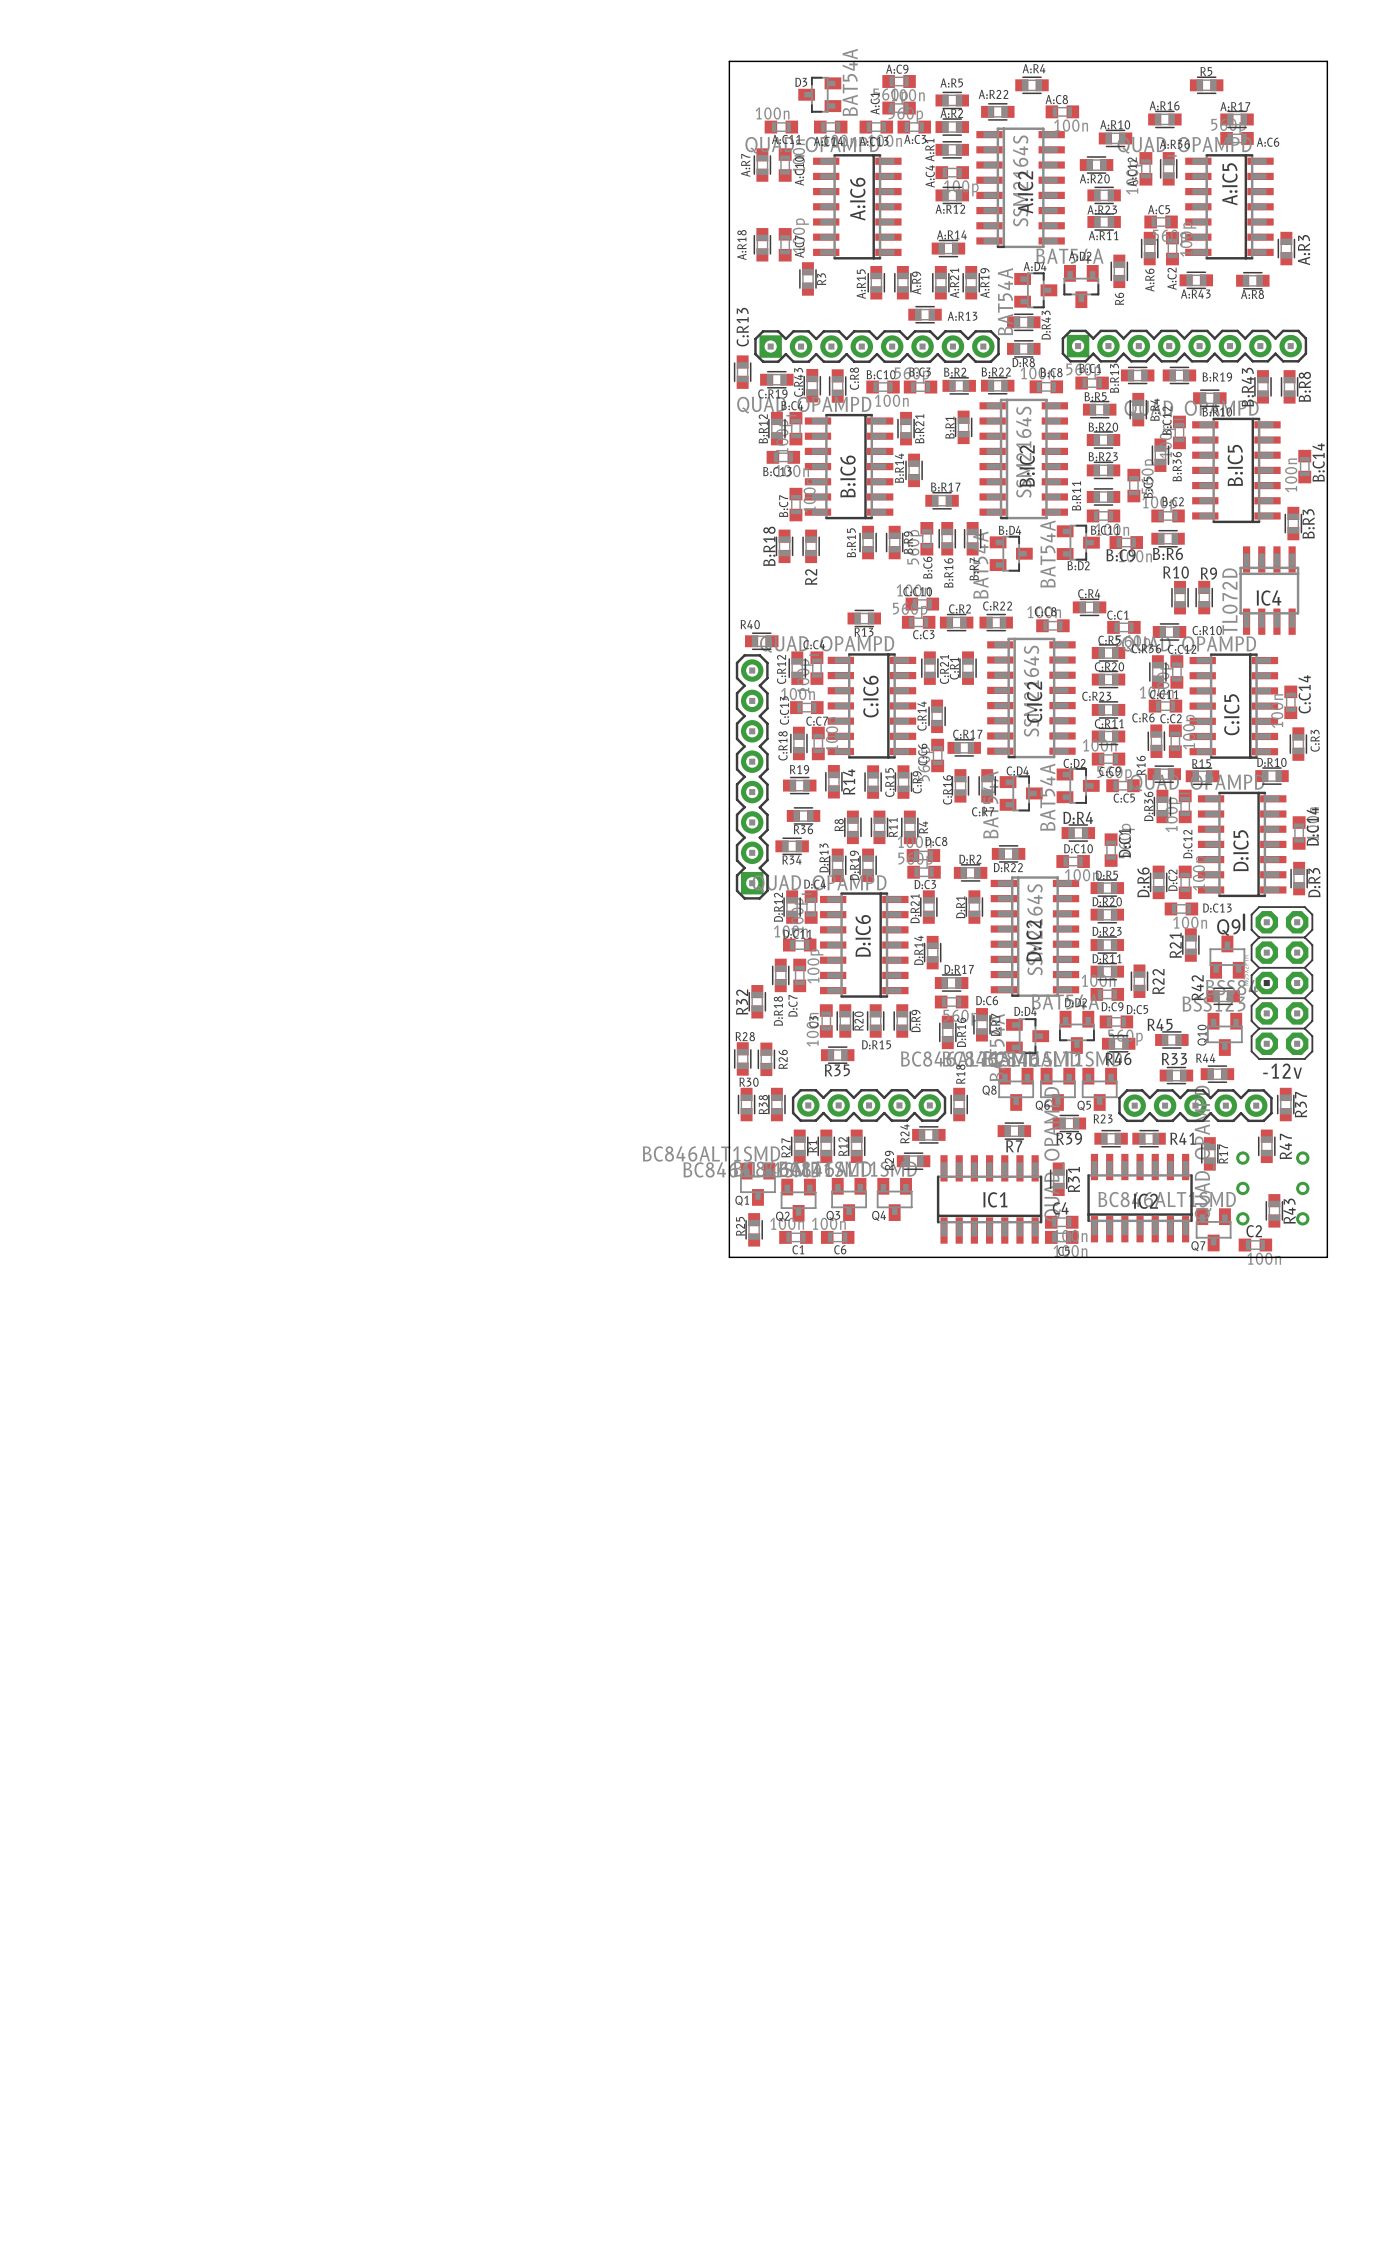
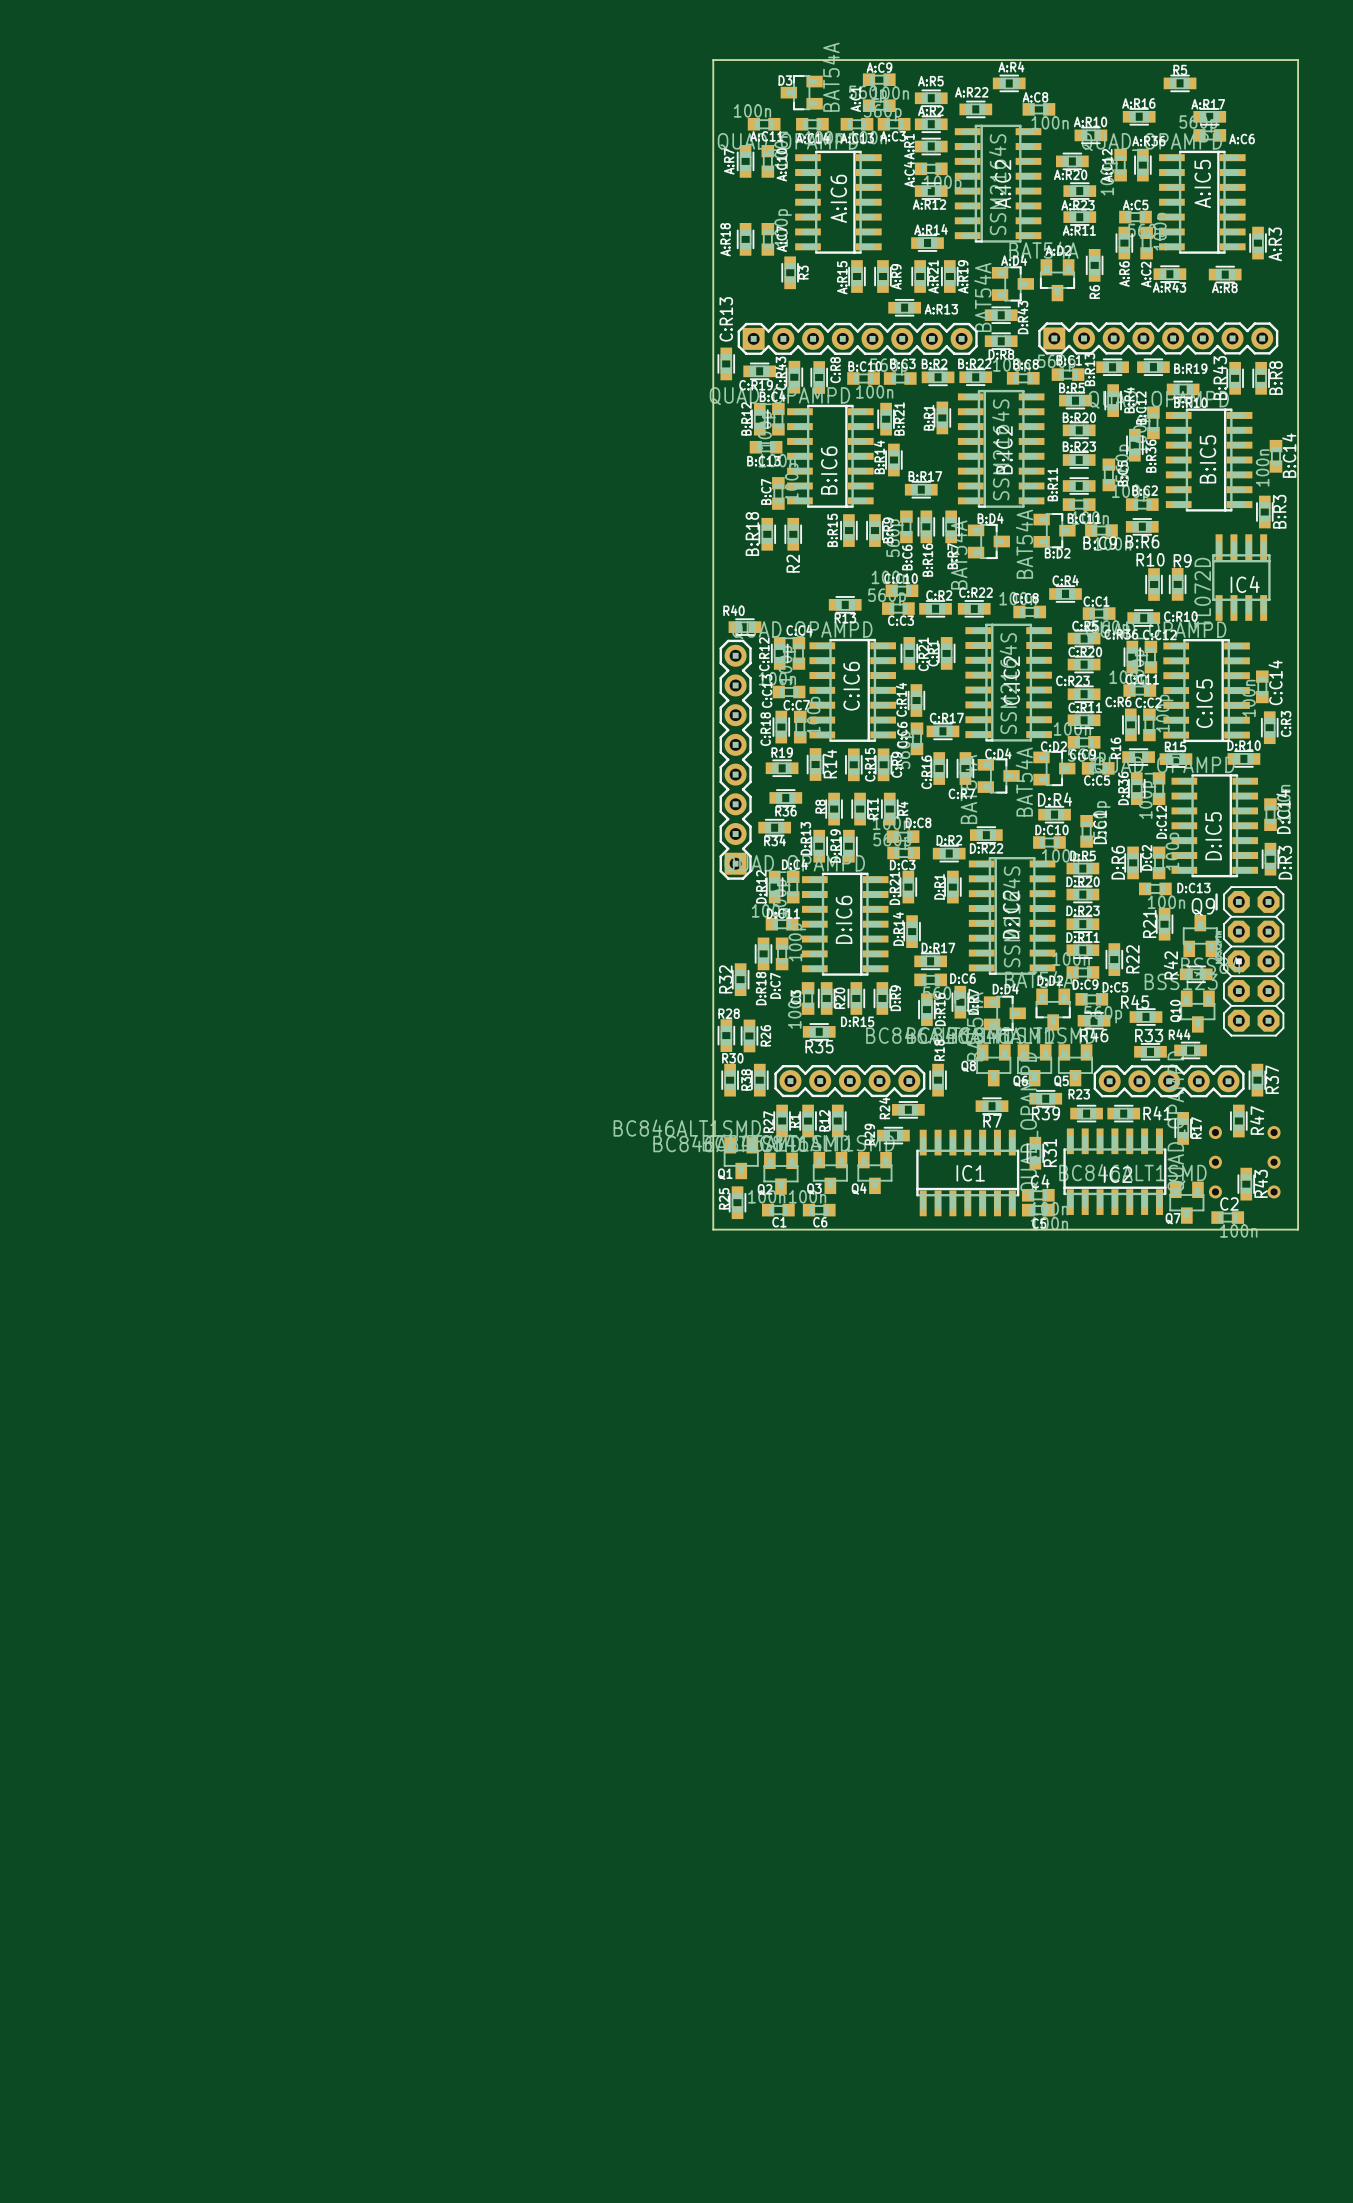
text: -12v (1282, 1071) -> none

